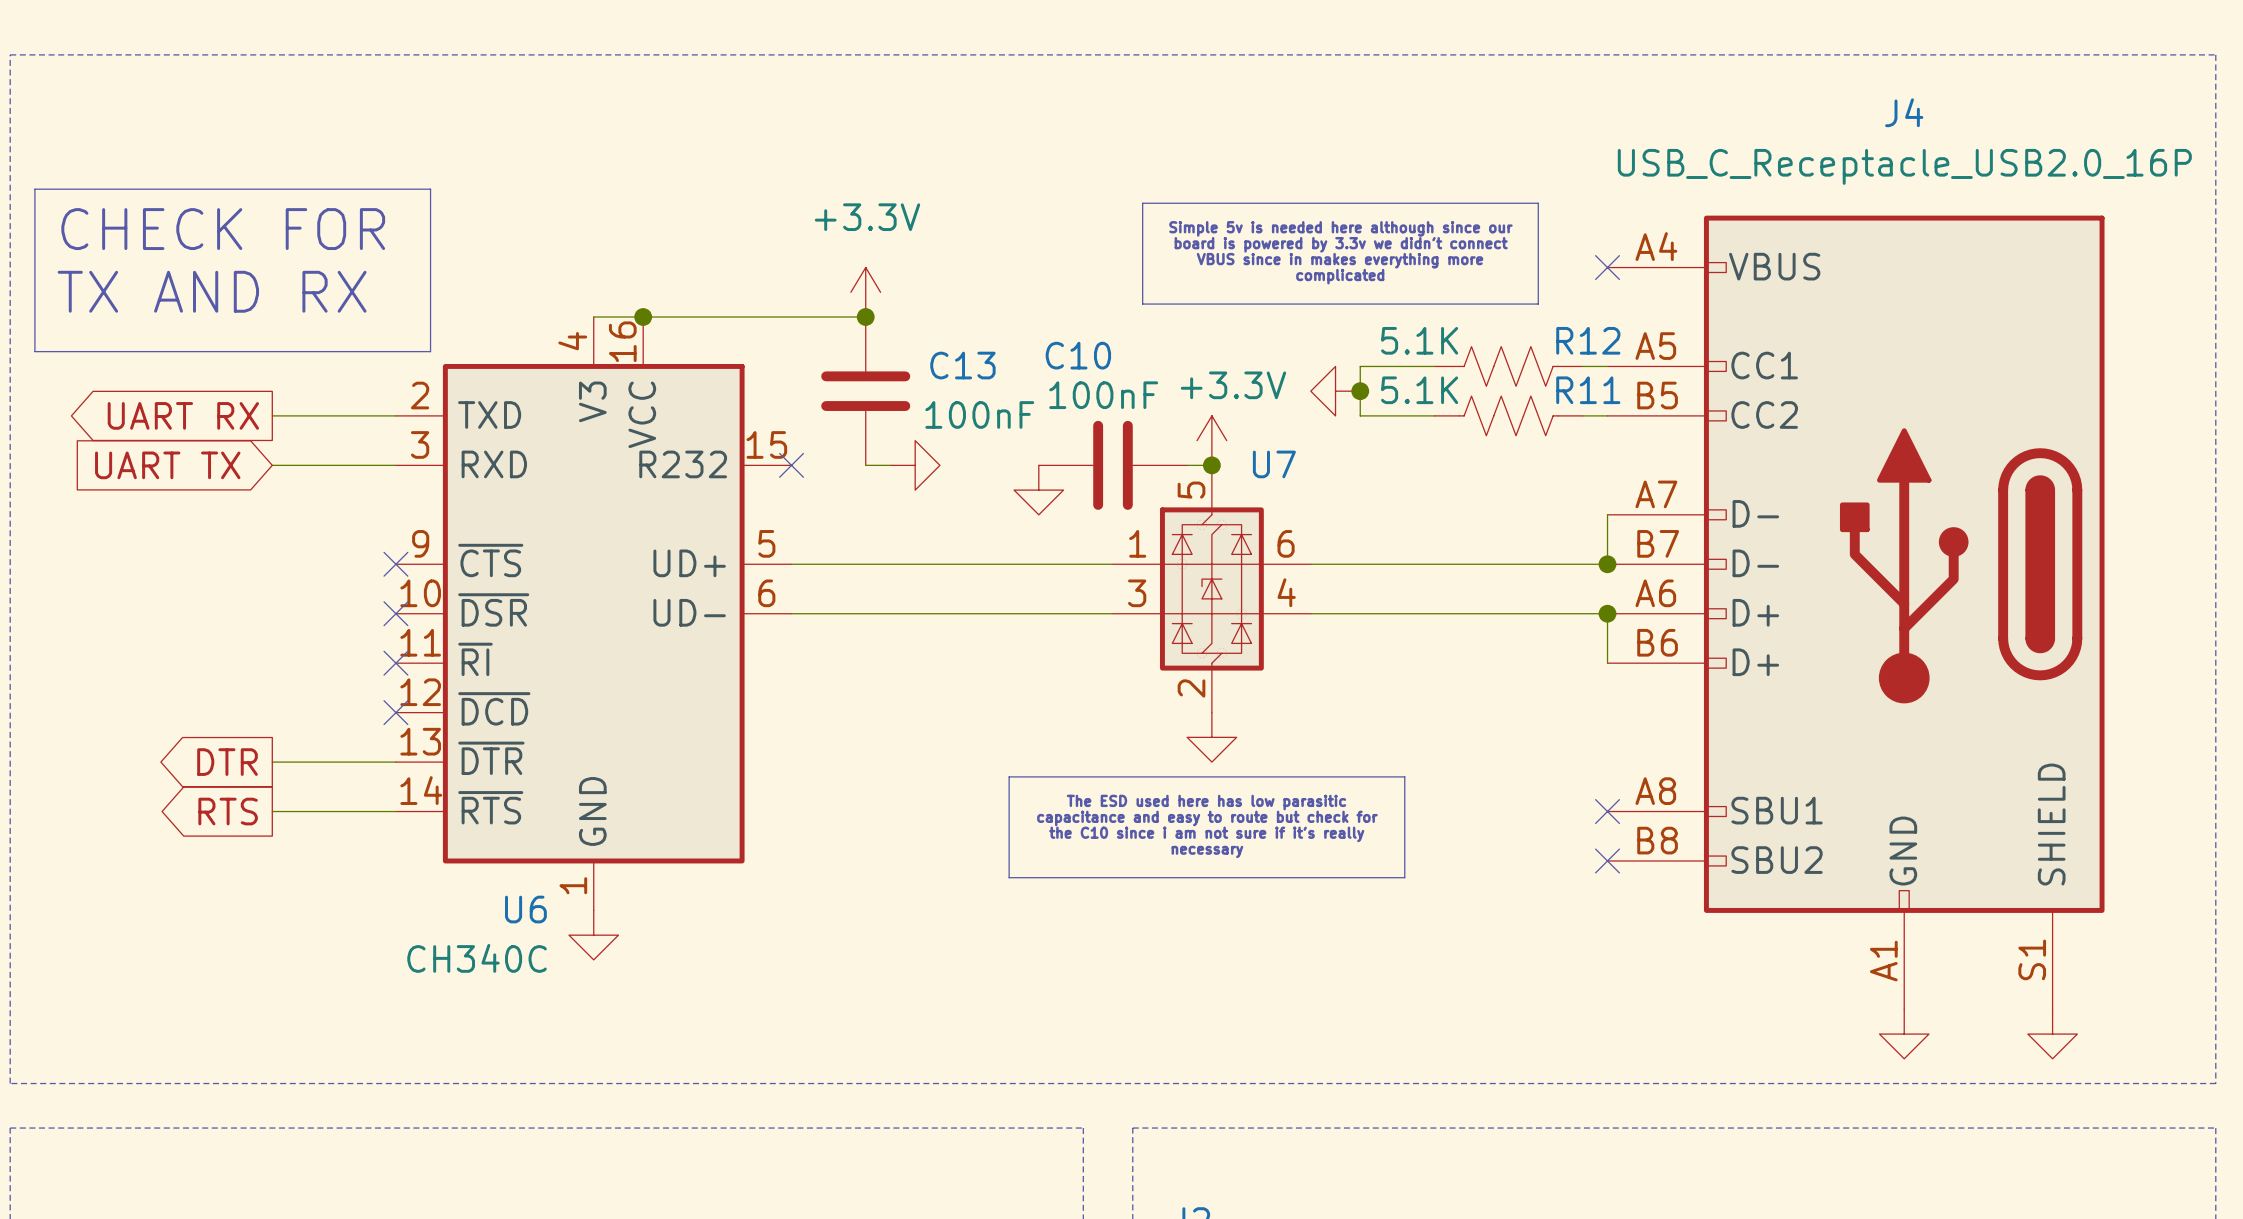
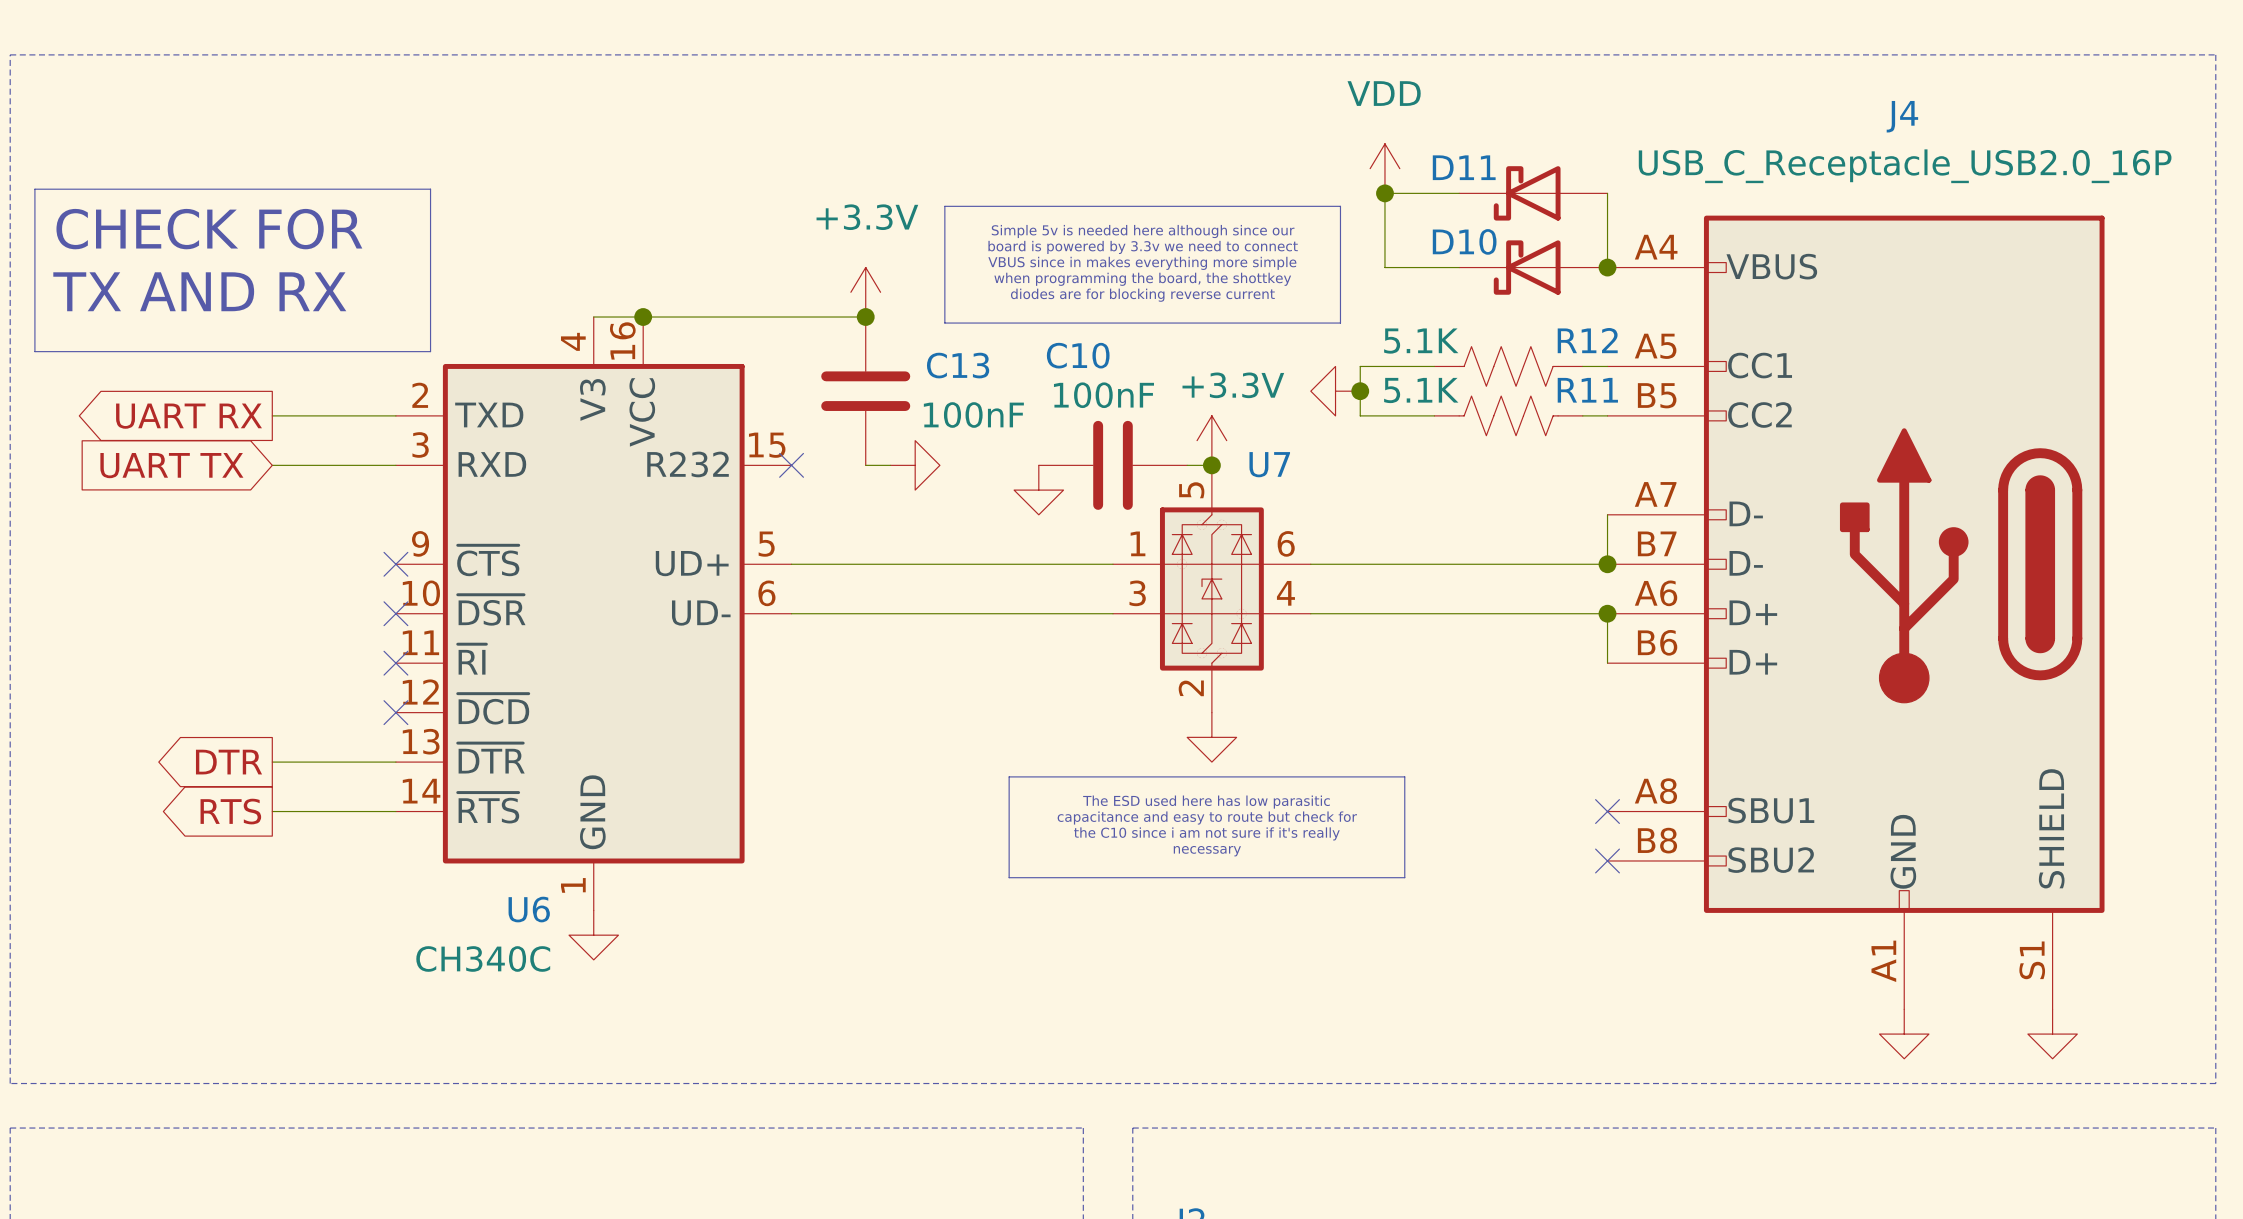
power symbol: none -> VDD (1384, 168)
junction: none -> (1384, 193)
wire: none -> (1459, 193) (1384, 193) (1384, 267) (1459, 267)
D11: none -> (1533, 193)
wire: none -> (1607, 193) (1607, 267)
line: (1142, 203) (1538, 203) (1538, 304) (1142, 304) (1142, 203) -> none
line: none -> (944, 206) (1340, 206) (1340, 323) (944, 323) (944, 206)
text position: Simple 5v is needed here although since our (1340, 228) -> Simple 5v is needed here although since our (1143, 231)
text: board is powered by 3.3v we didn't connect (1341, 244) -> board is powered by 3.3v we need to connect (1143, 247)
text: VBUS since in makes everything more (1340, 260) -> VBUS since in makes everything more simple (1142, 263)
D10: none -> (1533, 267)
no-connect mark: (1607, 267) -> none
junction: none -> (1607, 267)
text: complicated (1340, 276) -> none
text: none -> when programming the board, the shottkey (1142, 279)
text: none -> diodes are for blocking reverse current (1142, 295)

